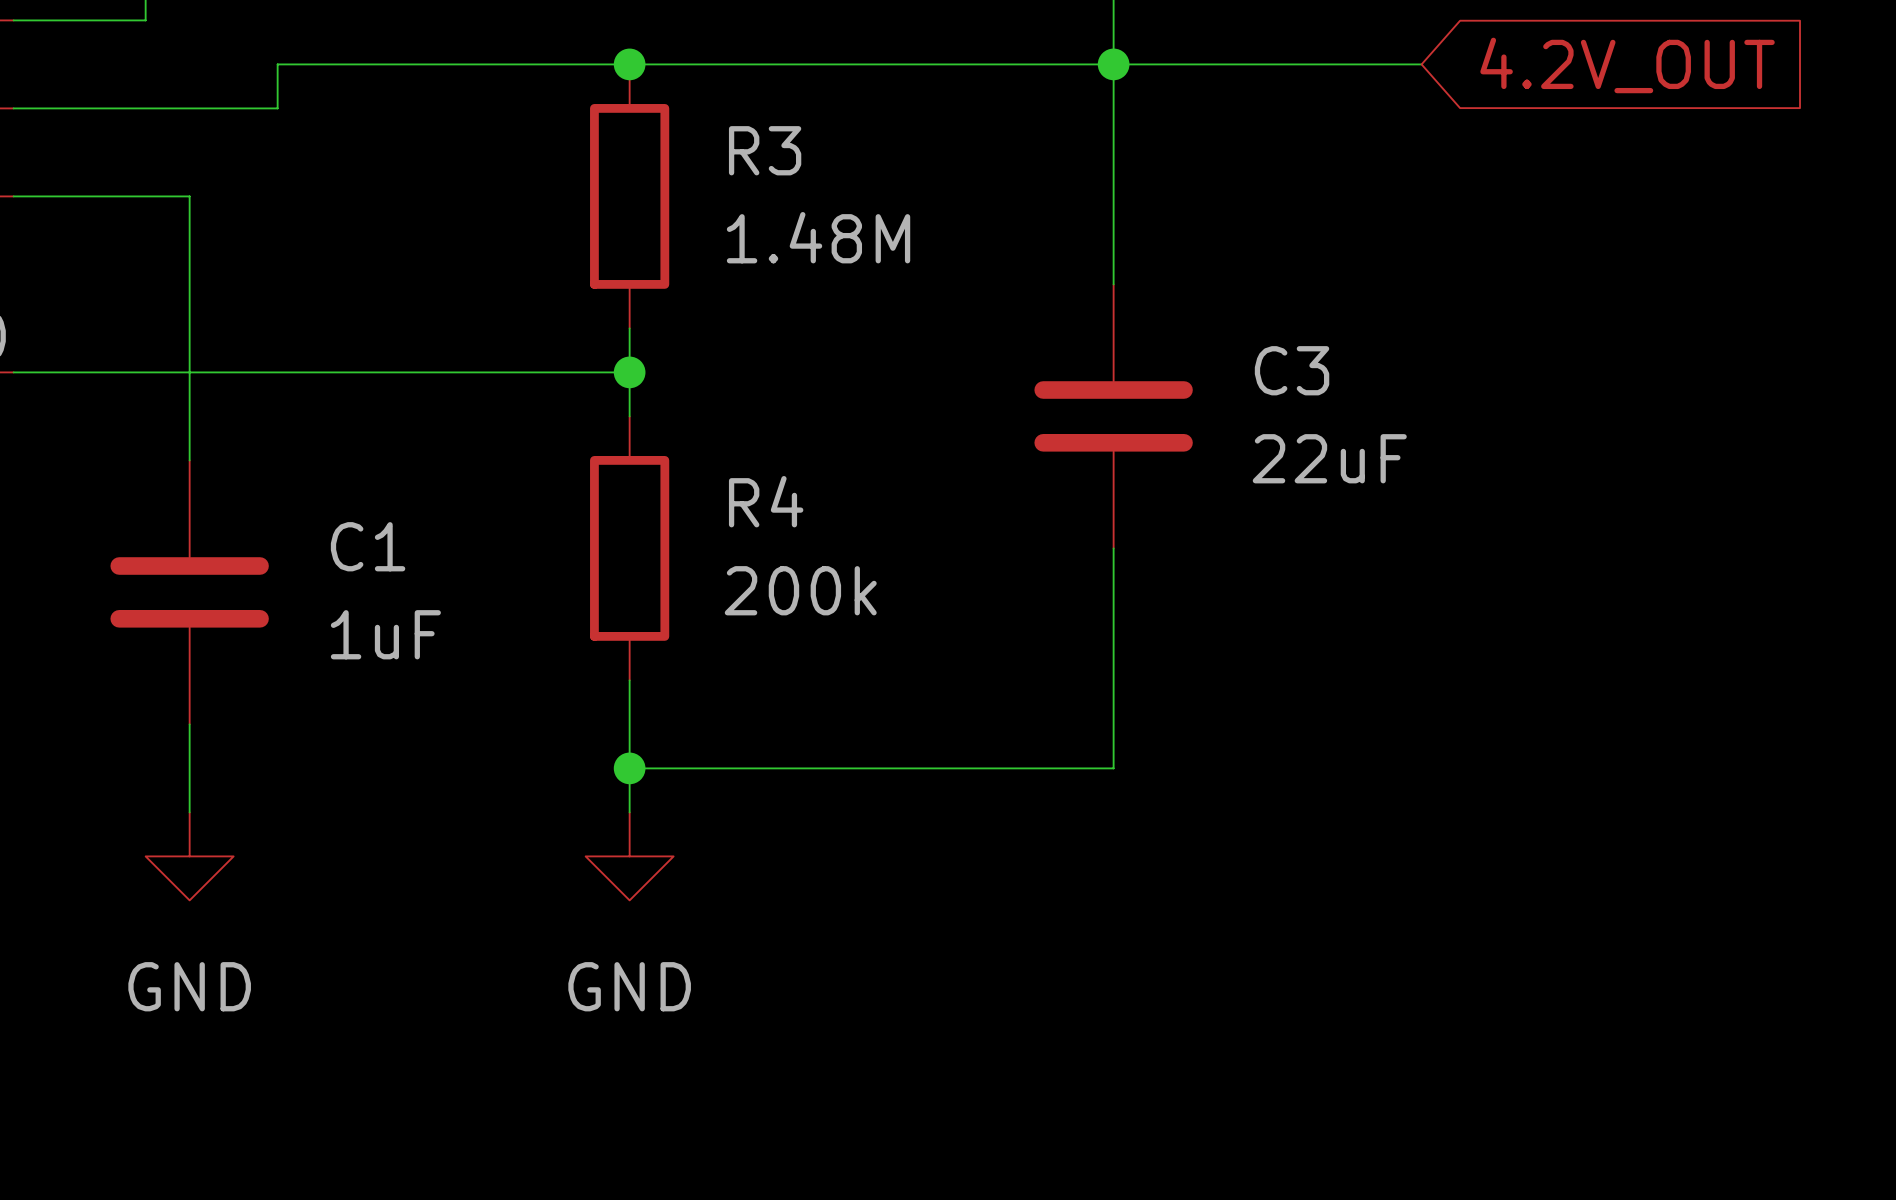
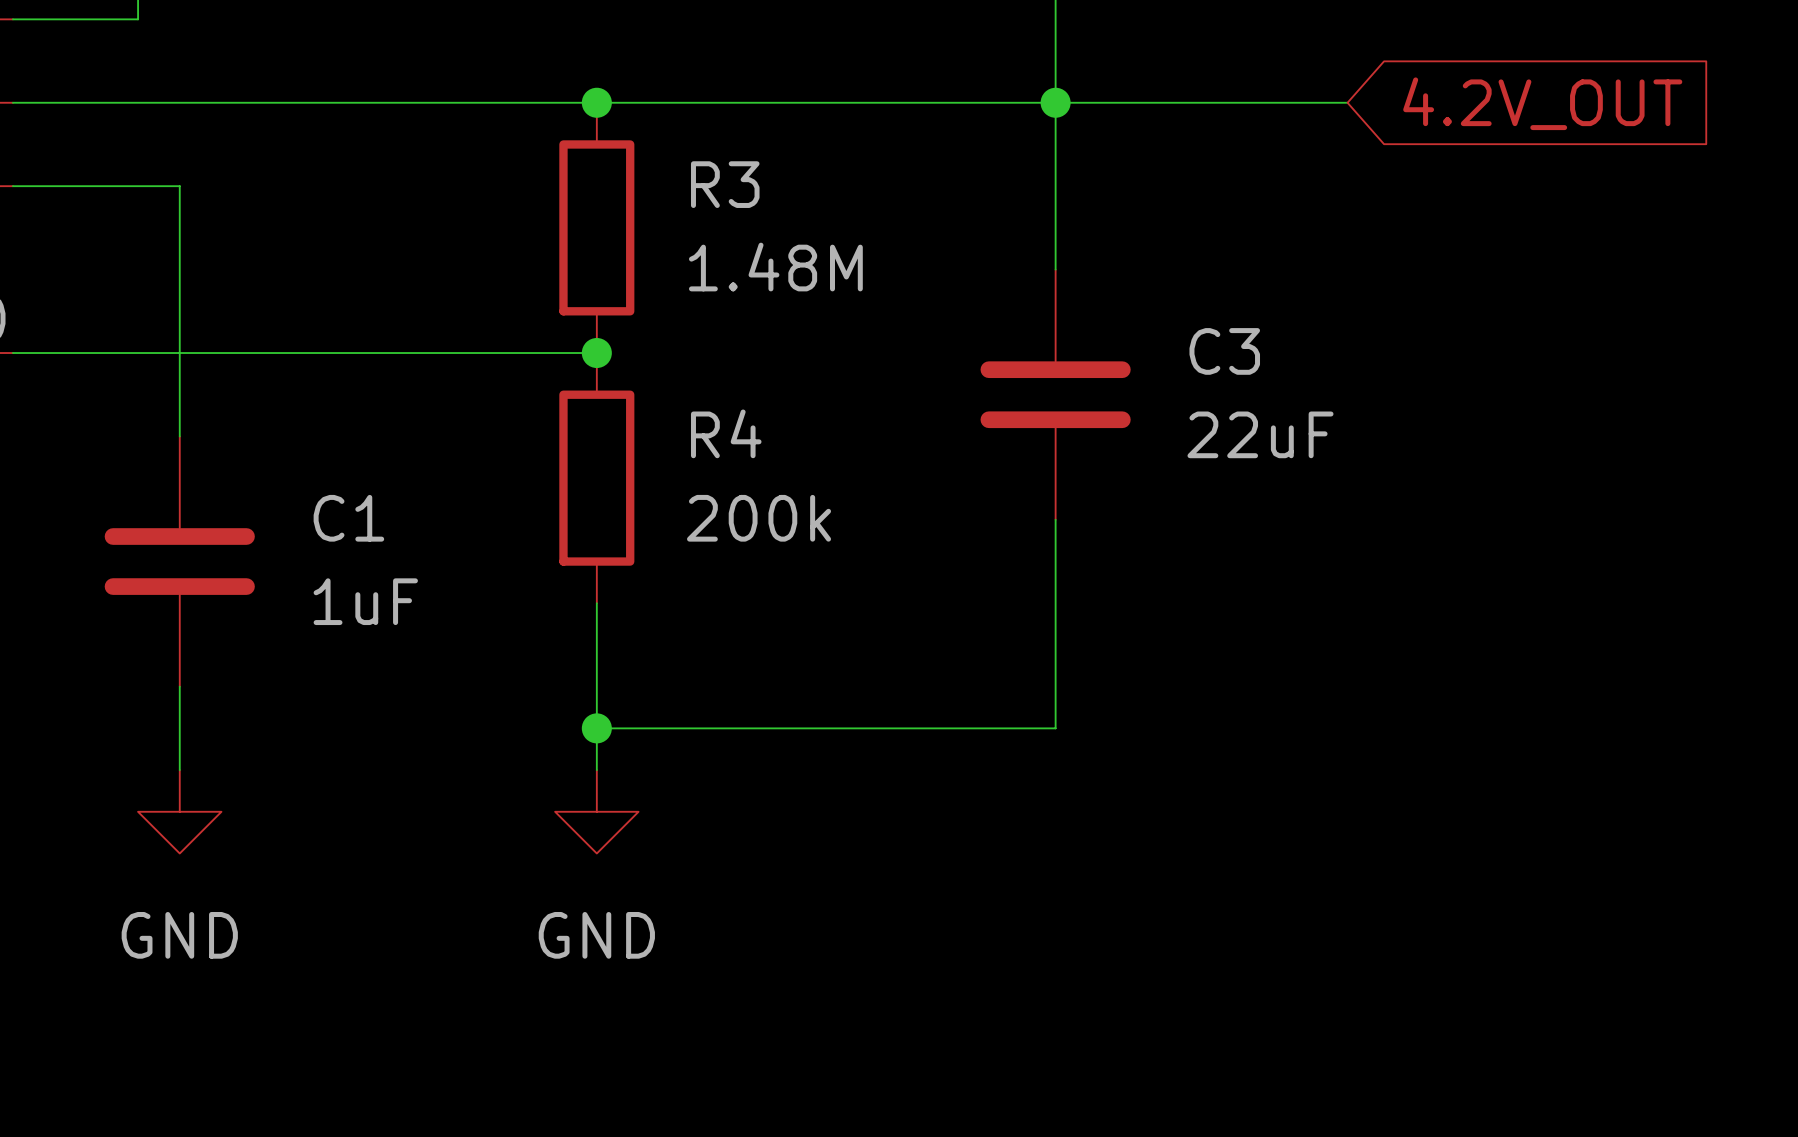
junction position: (629, 64) -> (596, 102)
junction position: (1113, 64) -> (1055, 102)
wire: (1421, 64) (277, 64) (277, 108) -> (1347, 102) (263, 102)
global label position: 4.2V_OUT (1627, 65) -> 4.2V_OUT (1542, 103)
R3 position: (629, 196) -> (596, 227)
R4 position: (629, 548) -> (596, 478)

